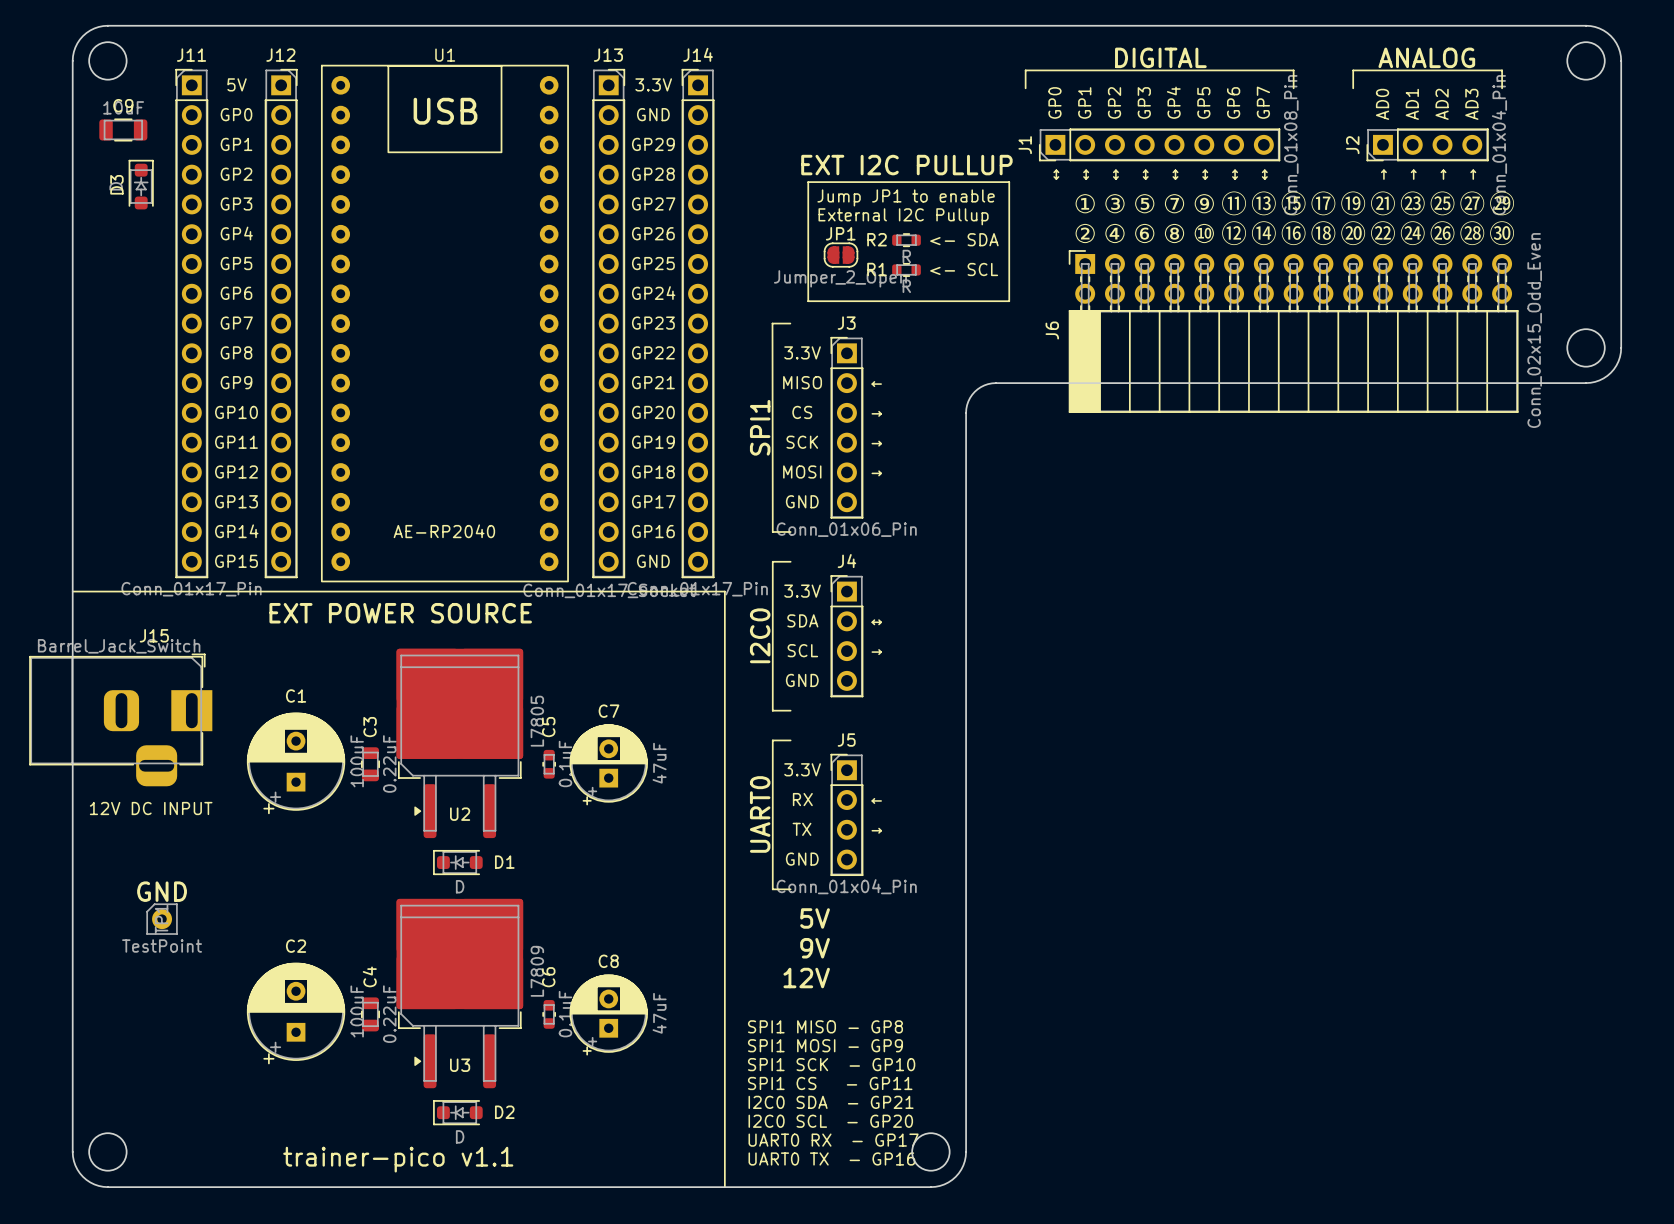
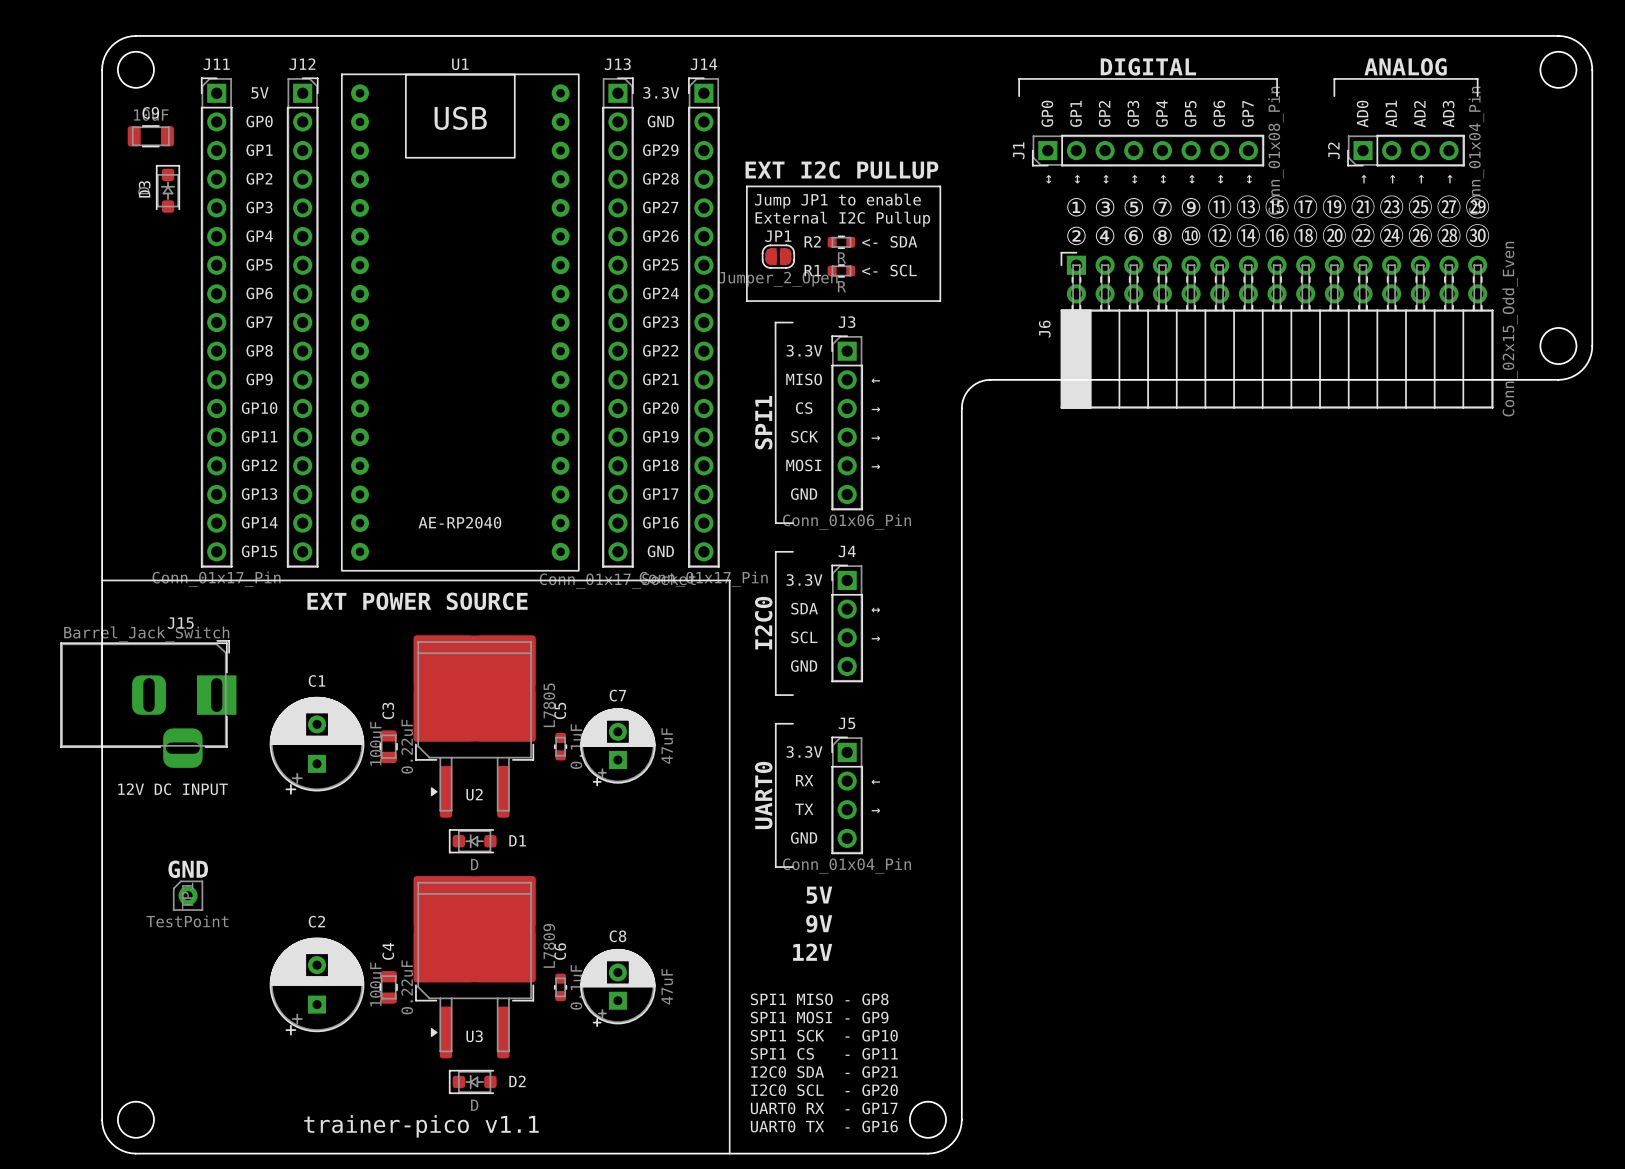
text position: EXT I2C PULLUP (906, 165) -> EXT I2C PULLUP (841, 170)
line: (808, 182) (808, 301) -> (809, 186) (746, 186) (746, 301) (809, 301)
line: (943, 182) (1009, 182) (1009, 301) (943, 301) -> (940, 186) (940, 301)
text position: Jump JP1 to enable (906, 197) -> Jump JP1 to enable (837, 201)
text position: External I2C Pullup (903, 216) -> External I2C Pullup (842, 219)
text position: <- SDA (964, 239) -> <- SDA (889, 241)
R2 position: (906, 240) -> (841, 242)
JP1 position: (841, 255) -> (778, 256)
R1 position: (906, 269) -> (841, 270)
text position: <- SCL (964, 269) -> <- SCL (889, 270)

